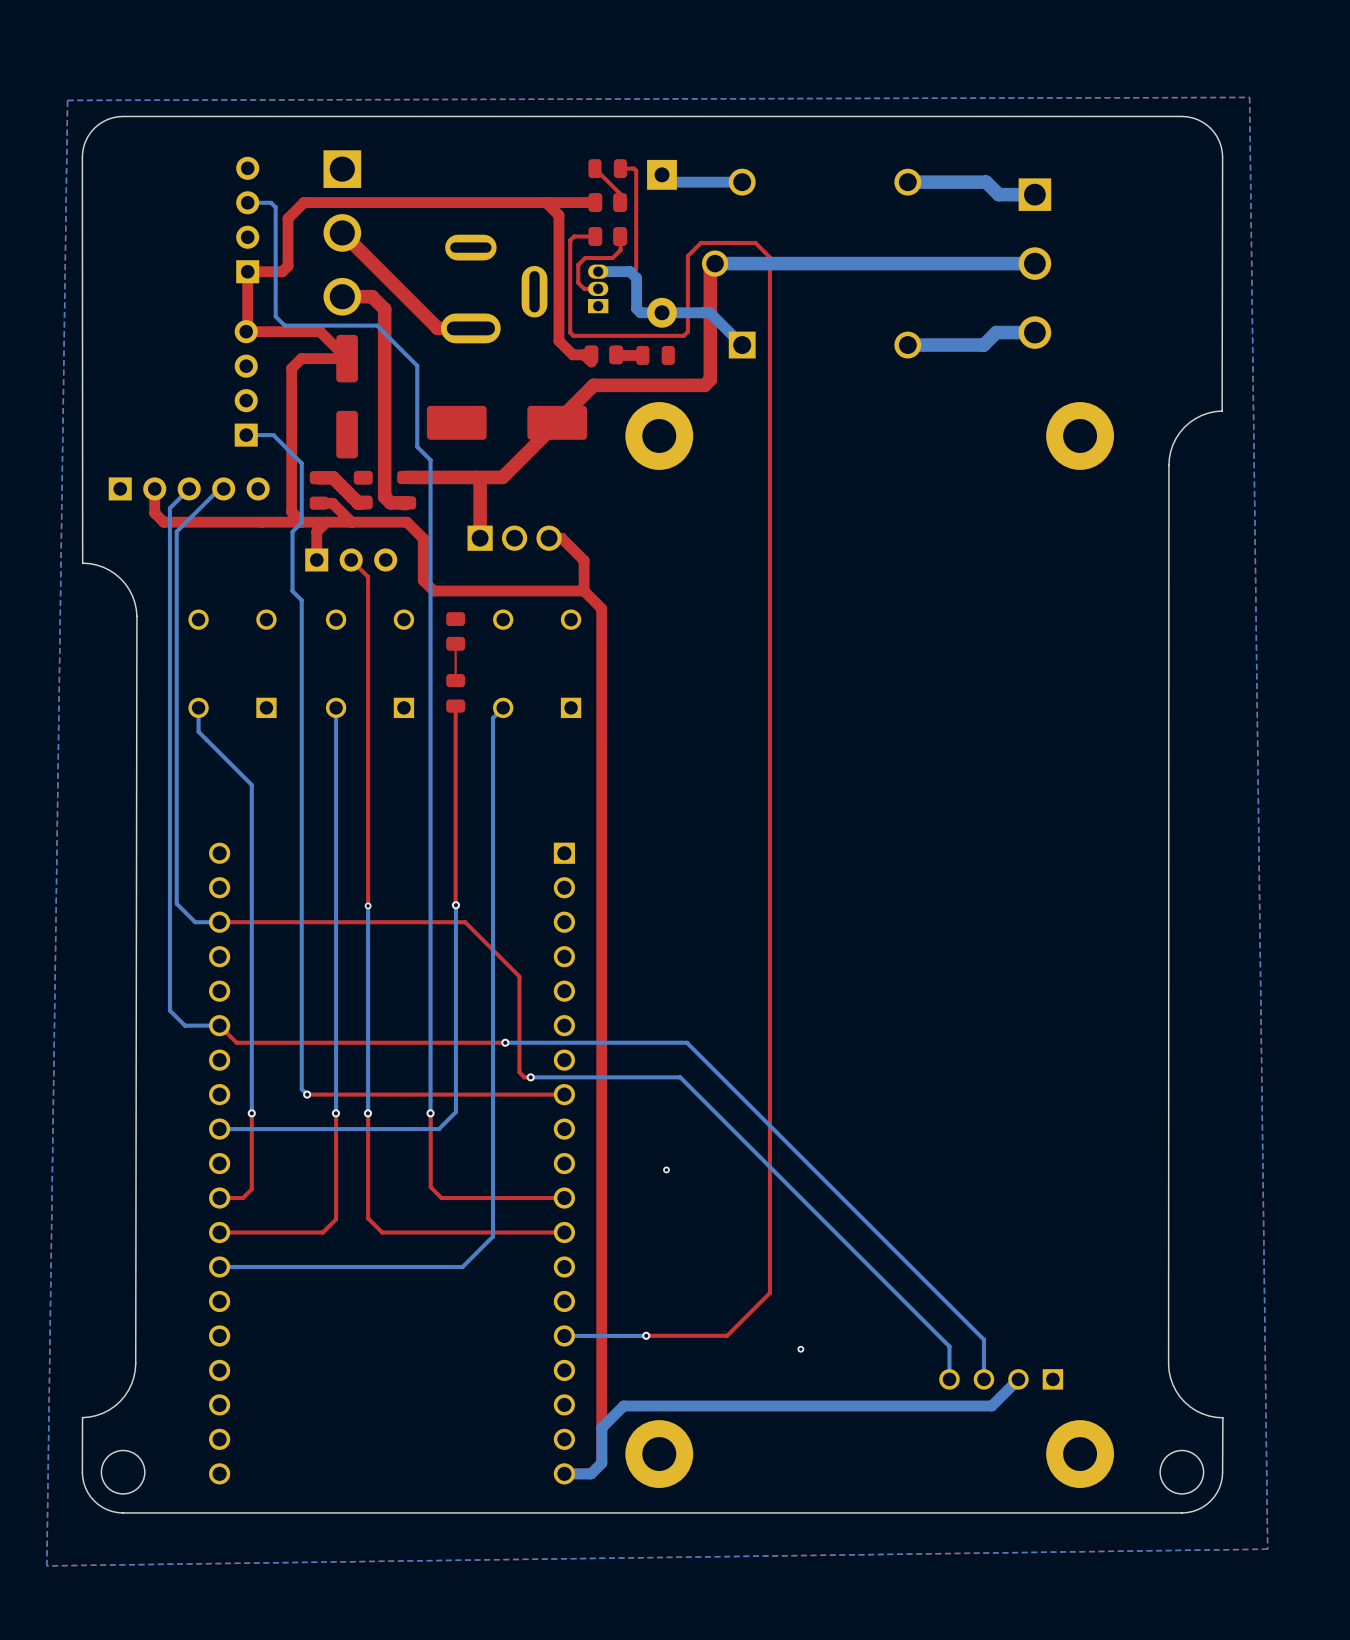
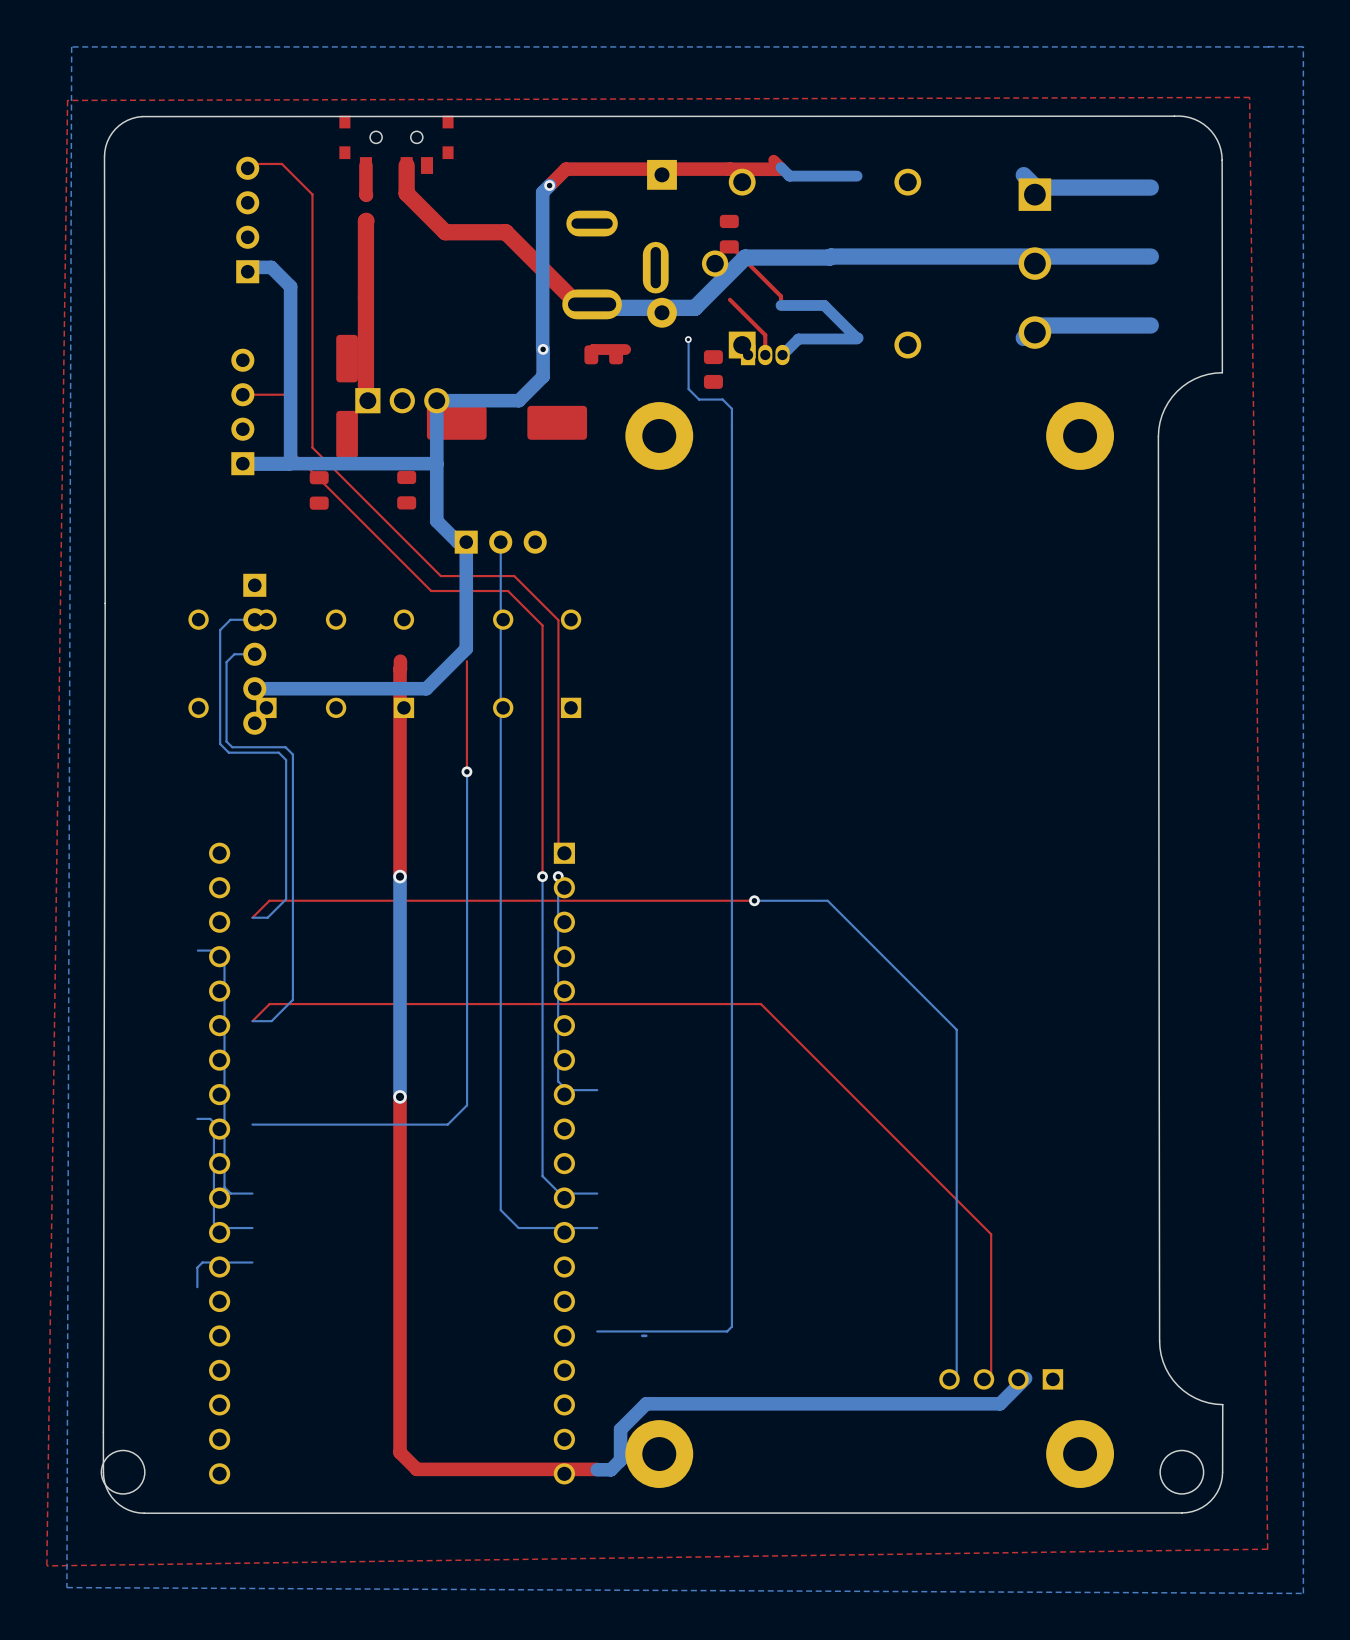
bottom zone outline: (67, 100) (46, 1565) (1267, 1549) (1249, 97) (67, 100) -> (1303, 46) (1303, 1593) (66, 1587) (71, 46) (1303, 46)
part: none -> (396, 144)
top track: none -> (773, 160) (781, 167)
top track: none -> (245, 163) (281, 163) (312, 194) (312, 447) (440, 576) (514, 576) (558, 620) (558, 847)
top track: none -> (365, 165) (366, 195)
top track: none -> (406, 165) (406, 193) (445, 232) (505, 232) (577, 304) (592, 304)
bottom track: none -> (781, 167) (789, 176) (857, 176)
top track: (594, 168) (620, 193) (620, 202) -> none
part: (607, 168) -> none
top track: (620, 168) (634, 168) (636, 170) (636, 268) (633, 271) (598, 271) -> none
top track: none -> (729, 169) (566, 169) (549, 185)
top track: none -> (779, 169) (730, 169)
bottom track: (742, 174) (734, 182) (669, 182) (661, 174) -> none
bottom track: none -> (1023, 175) (1036, 187) (1150, 187)
bottom track: (907, 182) (986, 182) (998, 194) (1034, 194) -> none
bottom track: none -> (549, 185) (542, 192) (543, 376) (518, 400) (436, 400) (436, 521) (457, 542) (466, 542) (466, 648) (426, 688) (254, 688)
via: none -> (549, 185)
bottom track: (247, 202) (271, 202) (275, 207) (275, 316) (284, 325) (377, 325) (417, 365) (417, 446) (430, 460) (430, 1113) -> none
top track: (546, 202) (558, 215) (558, 340) (572, 354) (584, 354) (591, 362) -> none
top track: (595, 202) (304, 202) (288, 218) (288, 266) (282, 271) (247, 271) (246, 331) (320, 331) (347, 358) (301, 358) (291, 368) (291, 511) (302, 522) -> none
part: (607, 202) -> none
top track: none -> (366, 220) (365, 398) (367, 400)
top track: (342, 232) (437, 328) (470, 328) -> none
part: (342, 232) -> none
part: none -> (729, 234)
top track: (595, 236) (574, 236) (570, 240) (570, 332) (573, 335) (683, 335) (687, 331) (687, 255) (700, 242) (755, 242) (769, 257) (769, 1293) (727, 1335) (646, 1335) -> none
part: (607, 236) -> none
top track: (620, 236) (620, 250) (612, 258) (585, 258) (578, 264) (578, 282) (584, 288) (598, 288) -> none
top track: none -> (729, 246) (731, 246) (781, 296) (781, 305)
bottom track: none -> (1150, 256) (745, 257) (694, 307) (595, 307) (592, 304)
top track: (714, 263) (710, 267) (710, 379) (704, 385) (593, 385) (502, 477) (406, 477) -> none
bottom track: (1034, 263) (715, 263) -> none
bottom track: none -> (245, 267) (271, 267) (290, 286) (289, 463)
bottom track: (598, 271) (630, 271) (636, 278) (636, 308) (640, 312) (709, 312) (742, 345) -> none
part rotation: 0° (598, 288) -> 90° clockwise (765, 355)
part position: (598, 288) -> (765, 355)
part position: (494, 289) -> (615, 264)
top track: (342, 296) (372, 296) (384, 309) (384, 496) (390, 502) (406, 502) (402, 503) -> none
top track: none -> (729, 299) (765, 335) (765, 355)
bottom track: none -> (781, 305) (824, 305) (858, 337)
bottom track: none -> (1150, 325) (1036, 325) (1023, 337)
bottom track: (1034, 332) (996, 332) (983, 345) (907, 345) -> none
bottom track: none -> (689, 338) (688, 389) (699, 399) (722, 399) (731, 408) (731, 1326) (727, 1331) (597, 1331)
via: none -> (688, 339)
bottom track: none -> (857, 339) (798, 339) (782, 355)
via: none -> (543, 349)
top track: none -> (625, 349) (593, 349)
top track: (616, 354) (642, 355) -> none
part: (655, 355) -> none
part: none -> (713, 369)
part position: (246, 383) -> (242, 411)
bottom track: (246, 435) (273, 435) (301, 463) (301, 522) (292, 531) (292, 591) (301, 600) (301, 1089) (307, 1094) -> none
bottom track: none -> (243, 463) (436, 464)
top track: (319, 477) (333, 477) (358, 503) (362, 503) -> none
top track: (475, 477) (480, 481) (480, 538) -> none
top track: (154, 488) (154, 513) (163, 522) (406, 522) (423, 538) (423, 580) (433, 591) -> (242, 394) (283, 394) (295, 406) (295, 455) (431, 591) (433, 591)
bottom track: (189, 488) (169, 508) (169, 1010) (185, 1025) (219, 1025) -> none
part rotation: 0° (189, 488) -> 90° clockwise (254, 654)
part position: (189, 488) -> (254, 654)
bottom track: (223, 488) (219, 488) (176, 531) (176, 903) (195, 922) (219, 922) -> none
part: (363, 490) -> none
top track: (319, 503) (332, 503) (351, 522) -> none
top track: (326, 522) (316, 531) (316, 559) -> none
part position: (514, 538) -> (402, 400)
top track: (549, 538) (561, 538) (584, 560) (584, 591) -> none
bottom track: none -> (500, 542) (500, 1210) (518, 1228) (597, 1228)
top track: (351, 559) (368, 576) (368, 904) -> none
part position: (351, 559) -> (500, 542)
top track width: thick (508, 591) (433, 591) -> thin (508, 591) (433, 591)
top track: (584, 591) (508, 591) -> (542, 876) (542, 625) (508, 591)
top track: (584, 591) (601, 608) (601, 1463) (591, 1473) (564, 1473) -> none
bottom track: none -> (254, 619) (230, 619) (220, 630) (220, 743) (228, 752) (278, 752) (286, 760) (286, 899) (267, 917) (252, 917)
part: (455, 631) -> none
top track: (455, 643) (455, 680) -> none
bottom track: none -> (254, 654) (234, 654) (226, 662) (226, 741) (232, 747) (285, 747) (292, 754) (292, 999) (271, 1021) (252, 1021)
top track: none -> (400, 661) (400, 876)
top track: none -> (466, 661) (466, 771)
part: (455, 693) -> none
top track: (455, 706) (455, 905) -> none
bottom track: (198, 707) (198, 731) (251, 784) (251, 1113) -> none
bottom track: (336, 707) (336, 1113) -> none
bottom track: (503, 707) (493, 718) (493, 1236) (462, 1266) (219, 1266) -> none
via: none -> (466, 771)
bottom track: none -> (467, 771) (467, 1105) (447, 1124) (252, 1124)
bottom track: none -> (400, 876) (400, 1096)
via: none -> (400, 876)
bottom track: none -> (542, 876) (542, 1176) (559, 1193) (597, 1193)
via: none -> (542, 876)
bottom track: none -> (558, 876) (558, 1081) (566, 1090) (597, 1090)
via: none -> (558, 876)
bottom track: none -> (754, 900) (827, 900) (956, 1029) (956, 1378)
via: none -> (754, 900)
top track: none -> (755, 902) (269, 900) (252, 917)
bottom track: (368, 905) (368, 1113) -> none
via: (368, 905) -> none
bottom track: (455, 905) (455, 1112) (438, 1129) (219, 1129) -> none
via: (455, 905) -> none
top track: (219, 922) (465, 922) (519, 976) (519, 1072) (524, 1077) (530, 1077) -> none
bottom track: none -> (197, 950) (218, 950) (224, 956) (224, 1187) (230, 1193) (252, 1193)
top track: none -> (252, 1021) (269, 1004) (760, 1004) (991, 1234) (991, 1378)
top track: (219, 1025) (236, 1042) (505, 1042) -> none
bottom track: (505, 1042) (686, 1042) (983, 1339) (983, 1379) -> none
via: (505, 1042) -> none
bottom track: (530, 1077) (680, 1077) (949, 1346) (949, 1379) -> none
via: (530, 1077) -> none
via: (307, 1094) -> none
top track: (564, 1094) (307, 1094) -> none
top track: none -> (400, 1096) (400, 1452) (416, 1469) (597, 1469)
via: none -> (400, 1096)
top track: (430, 1112) (430, 1187) (441, 1198) (564, 1198) -> none
top track: (251, 1113) (251, 1189) (242, 1198) (219, 1198) -> none
via: (251, 1113) -> none
via: (335, 1113) -> none
top track: (336, 1113) (336, 1219) (322, 1232) (219, 1232) -> none
via: (367, 1113) -> none
top track: (368, 1113) (368, 1218) (382, 1232) (564, 1232) -> none
via: (430, 1113) -> none
bottom track: none -> (197, 1118) (210, 1118) (213, 1122) (213, 1222) (219, 1228) (252, 1228)
via: (666, 1169) -> none
bottom track: none -> (252, 1262) (202, 1262) (197, 1267) (197, 1287)
bottom track: (642, 1335) (564, 1335) -> none
via: (646, 1335) -> none
via: (800, 1349) -> none
bottom track: none -> (1025, 1378) (1000, 1403) (646, 1403) (620, 1429) (620, 1460) (610, 1469) (597, 1469)
bottom track: (1018, 1379) (991, 1405) (623, 1405) (601, 1427) (601, 1463) (591, 1473) (564, 1473) -> none
board edge: (1222, 1472) (1222, 1417) (1202, 1413) (1184, 1402) (1173, 1385) (1168, 1364) (1168, 465) (1172, 444) (1184, 427) (1201, 415) (1222, 411) (1222, 157) (1221, 146) (1214, 132) (1202, 121) (1181, 116) (123, 116) (107, 119) (98, 124) (87, 136) (82, 157) (82, 563) (103, 567) (120, 578) (132, 595) (136, 616) (135, 1363) (131, 1383) (120, 1401) (102, 1413) (82, 1417) (82, 1477) (90, 1497) (107, 1509) (123, 1512) (1181, 1512) -> (1222, 1472) (1222, 1404) (1208, 1402) (1195, 1398) (1178, 1385) (1165, 1368) (1161, 1355) (1159, 1340) (1158, 436) (1161, 415) (1168, 402) (1177, 391) (1194, 379) (1208, 374) (1222, 372) (1222, 160) (1219, 144) (1211, 131) (1199, 121) (1179, 116) (142, 116) (132, 118) (119, 125) (107, 141) (104, 156) (103, 1472) (106, 1488) (111, 1497) (123, 1507) (144, 1513) (1181, 1512)

